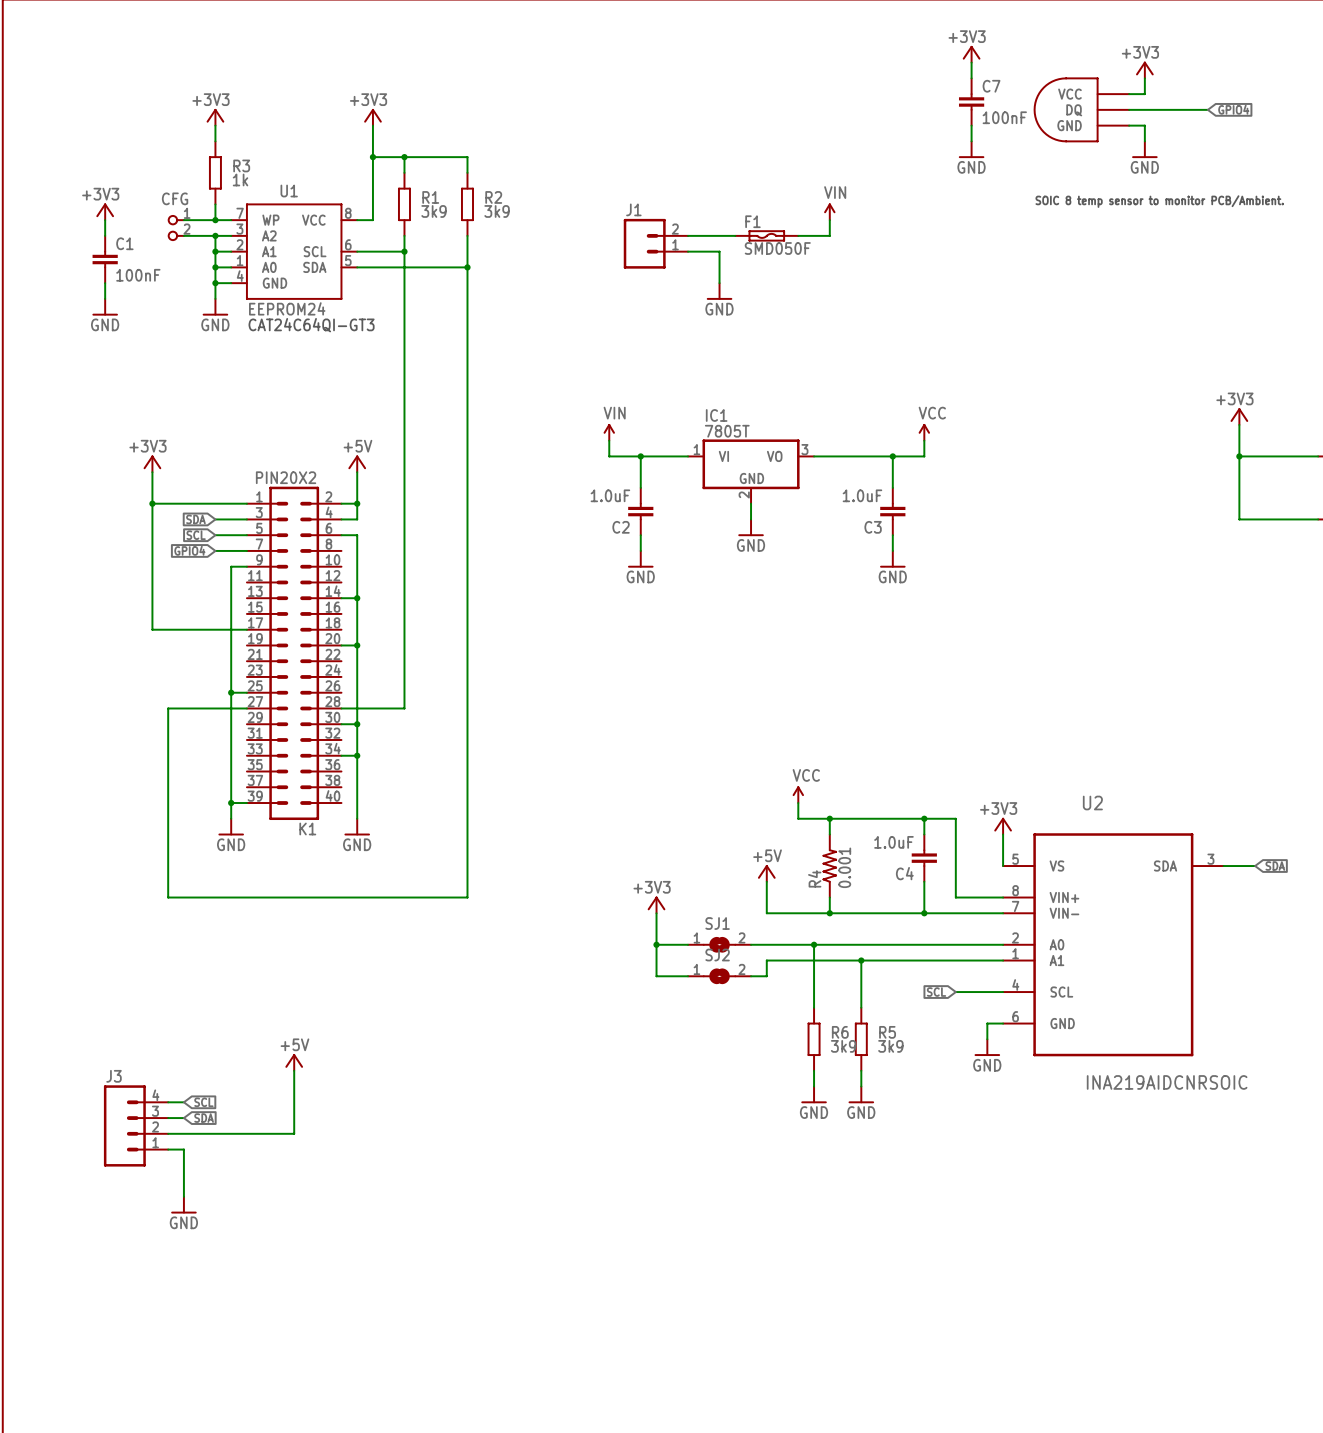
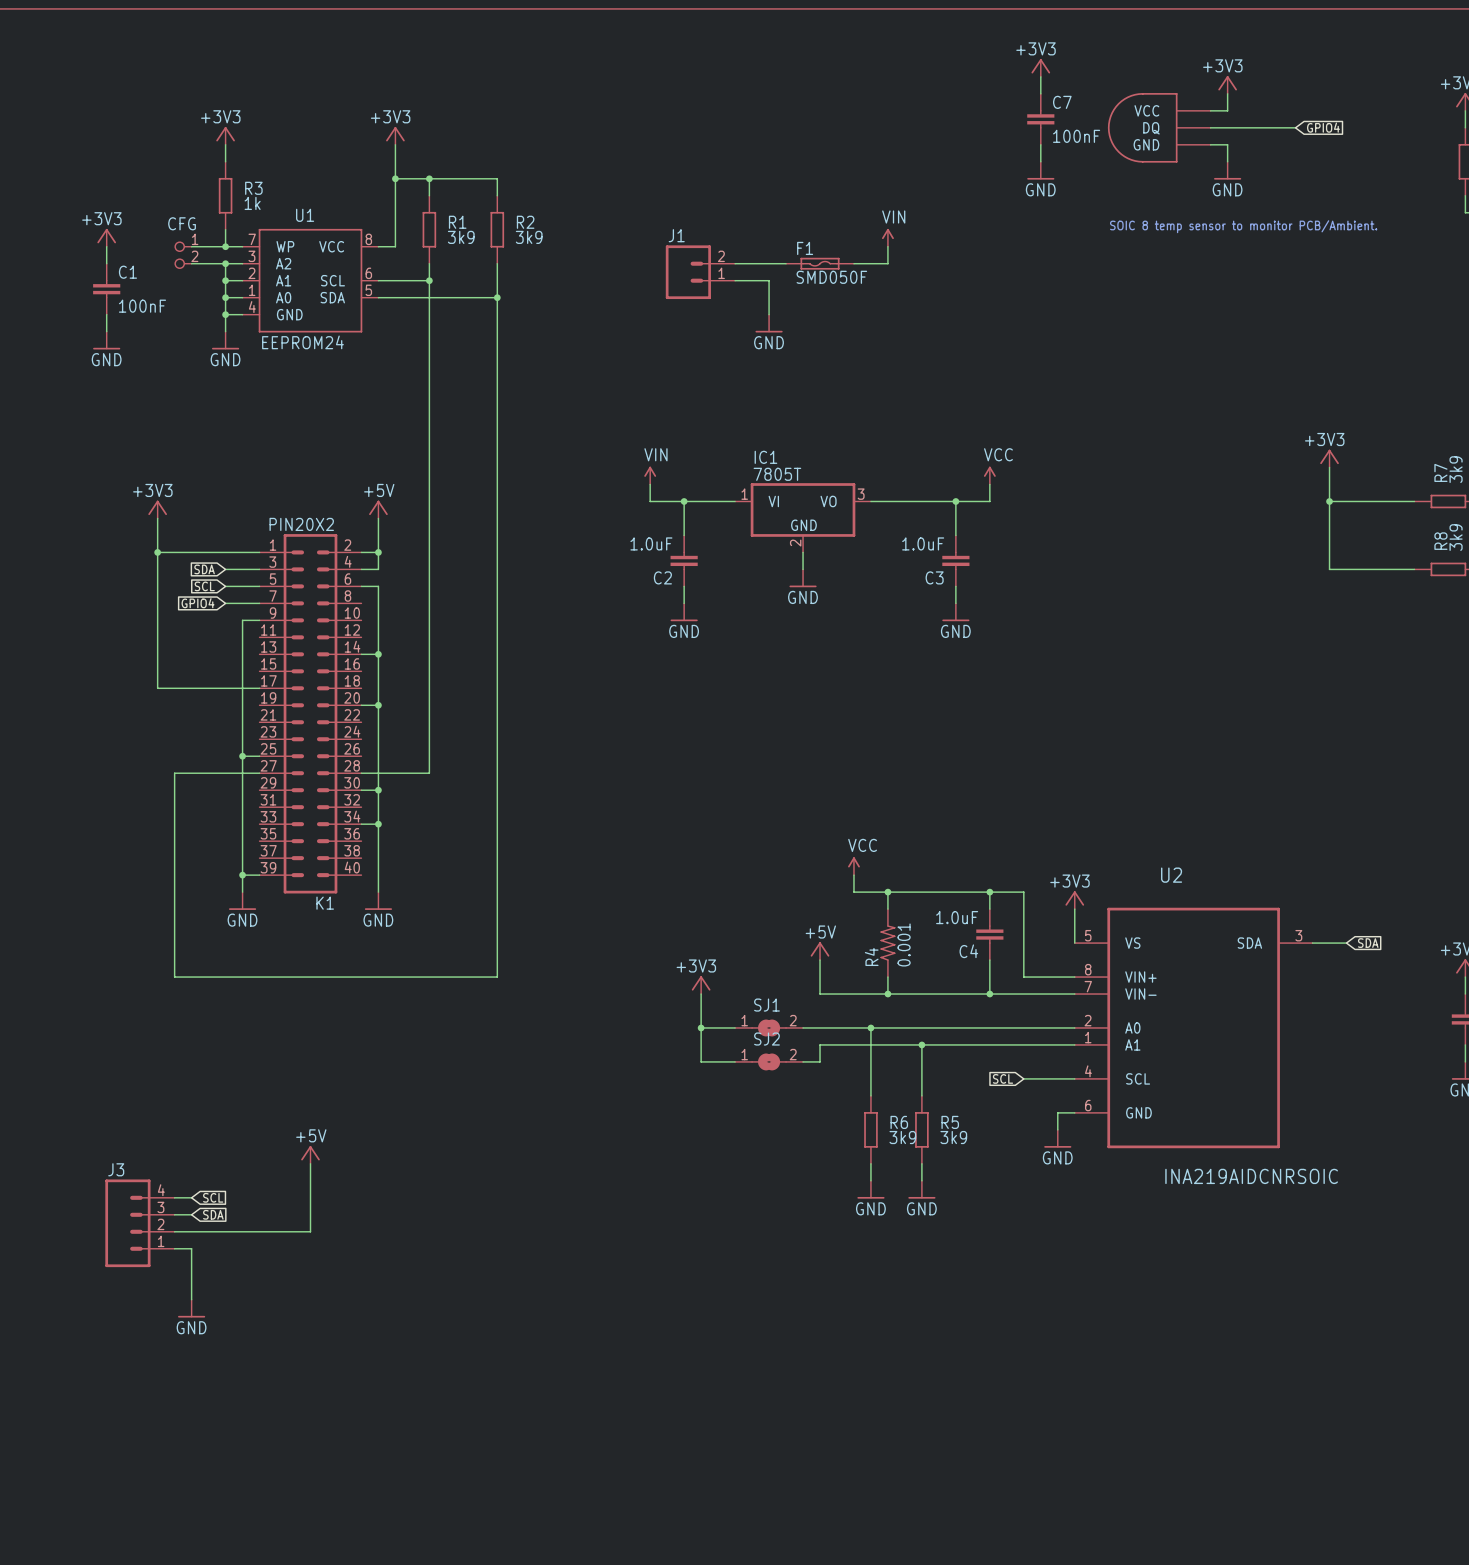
text: CAT24C64QI-GT3 (311, 325) -> none

